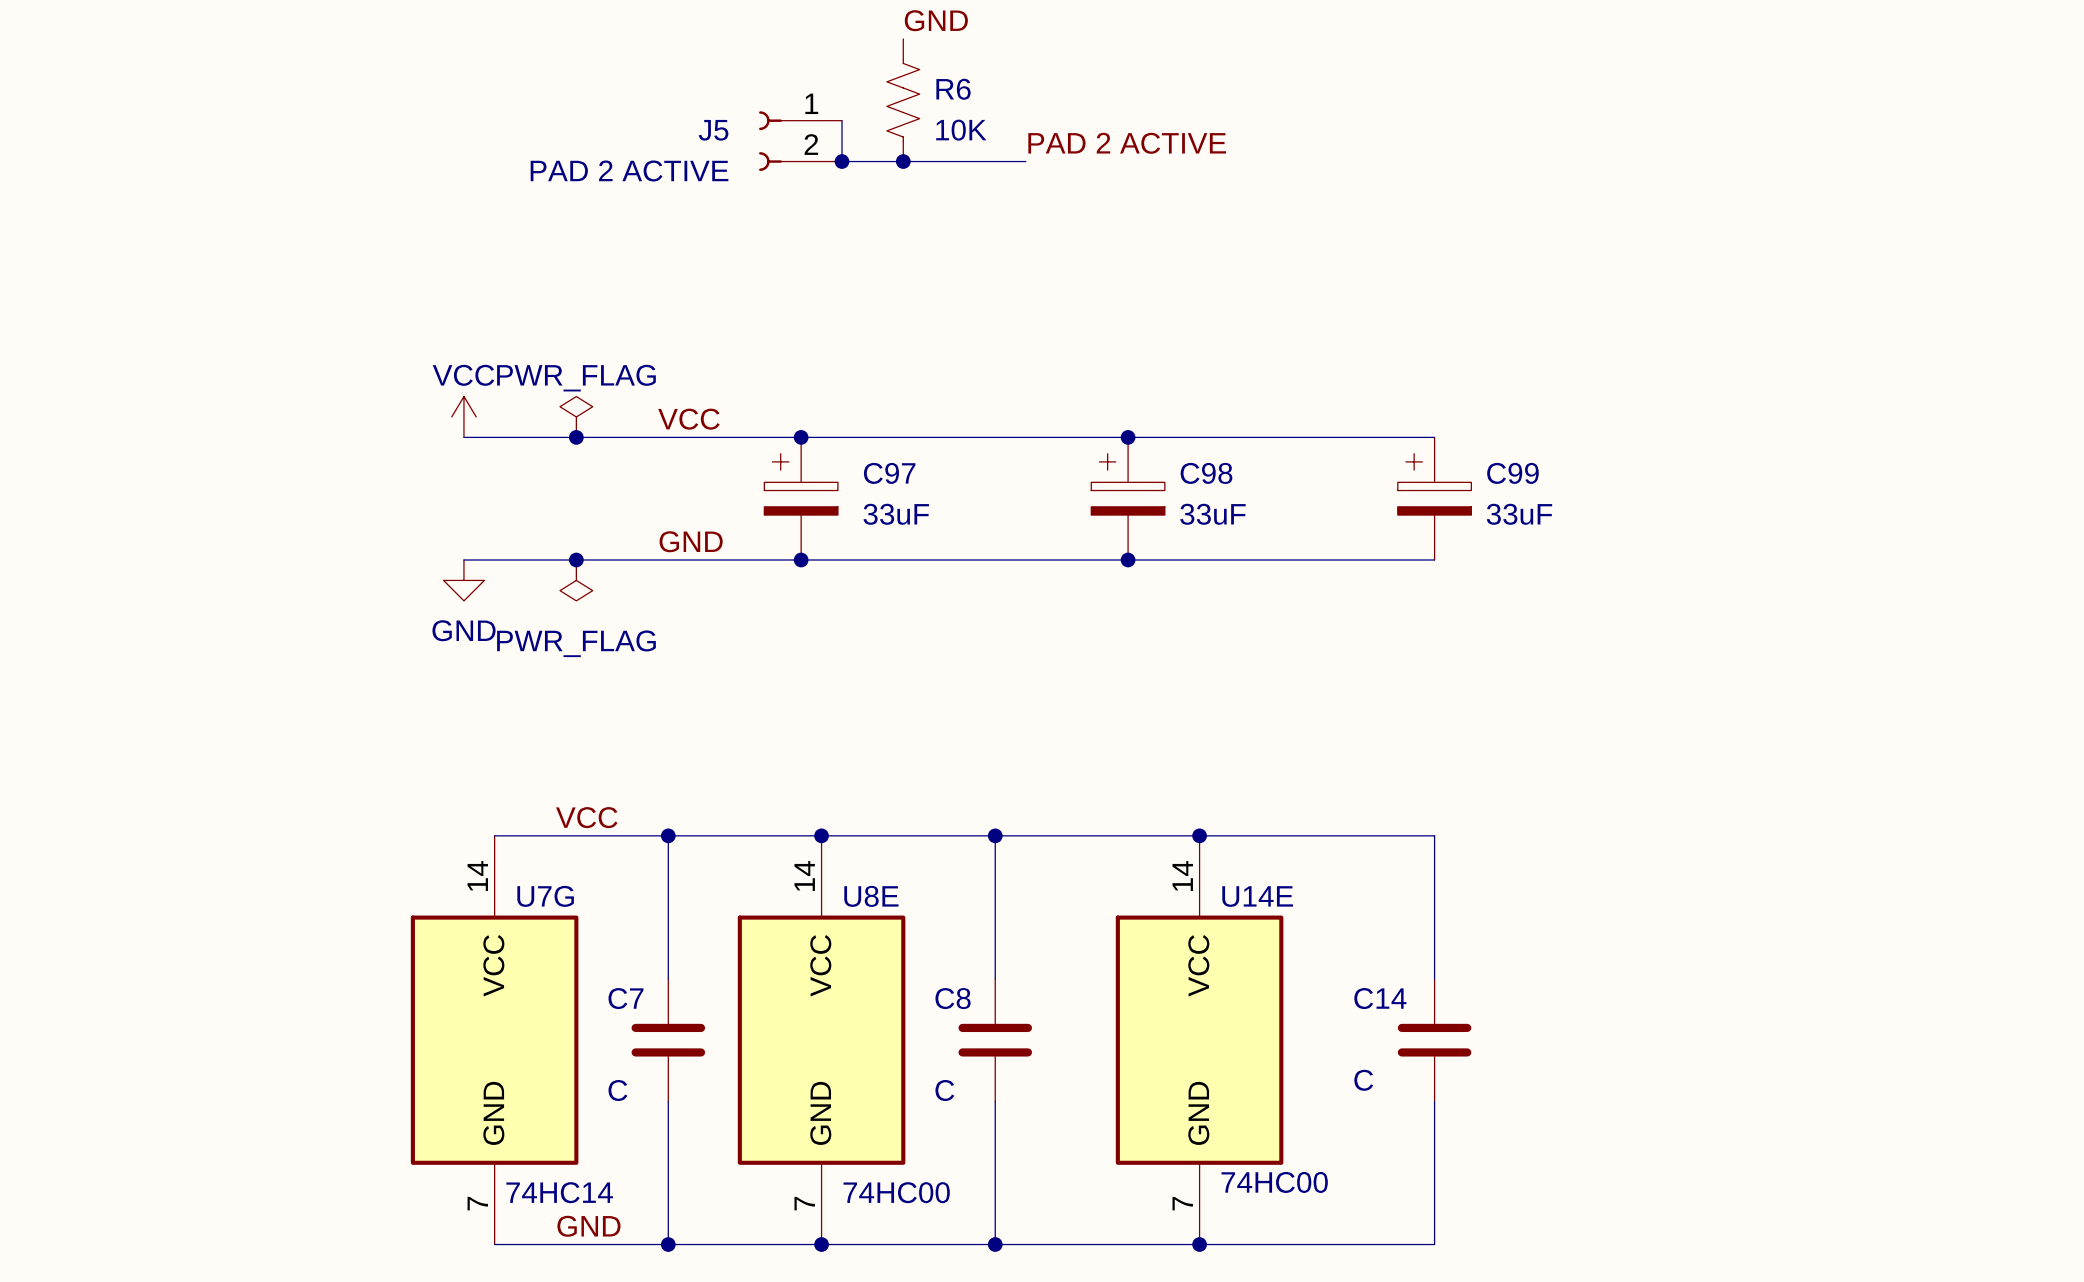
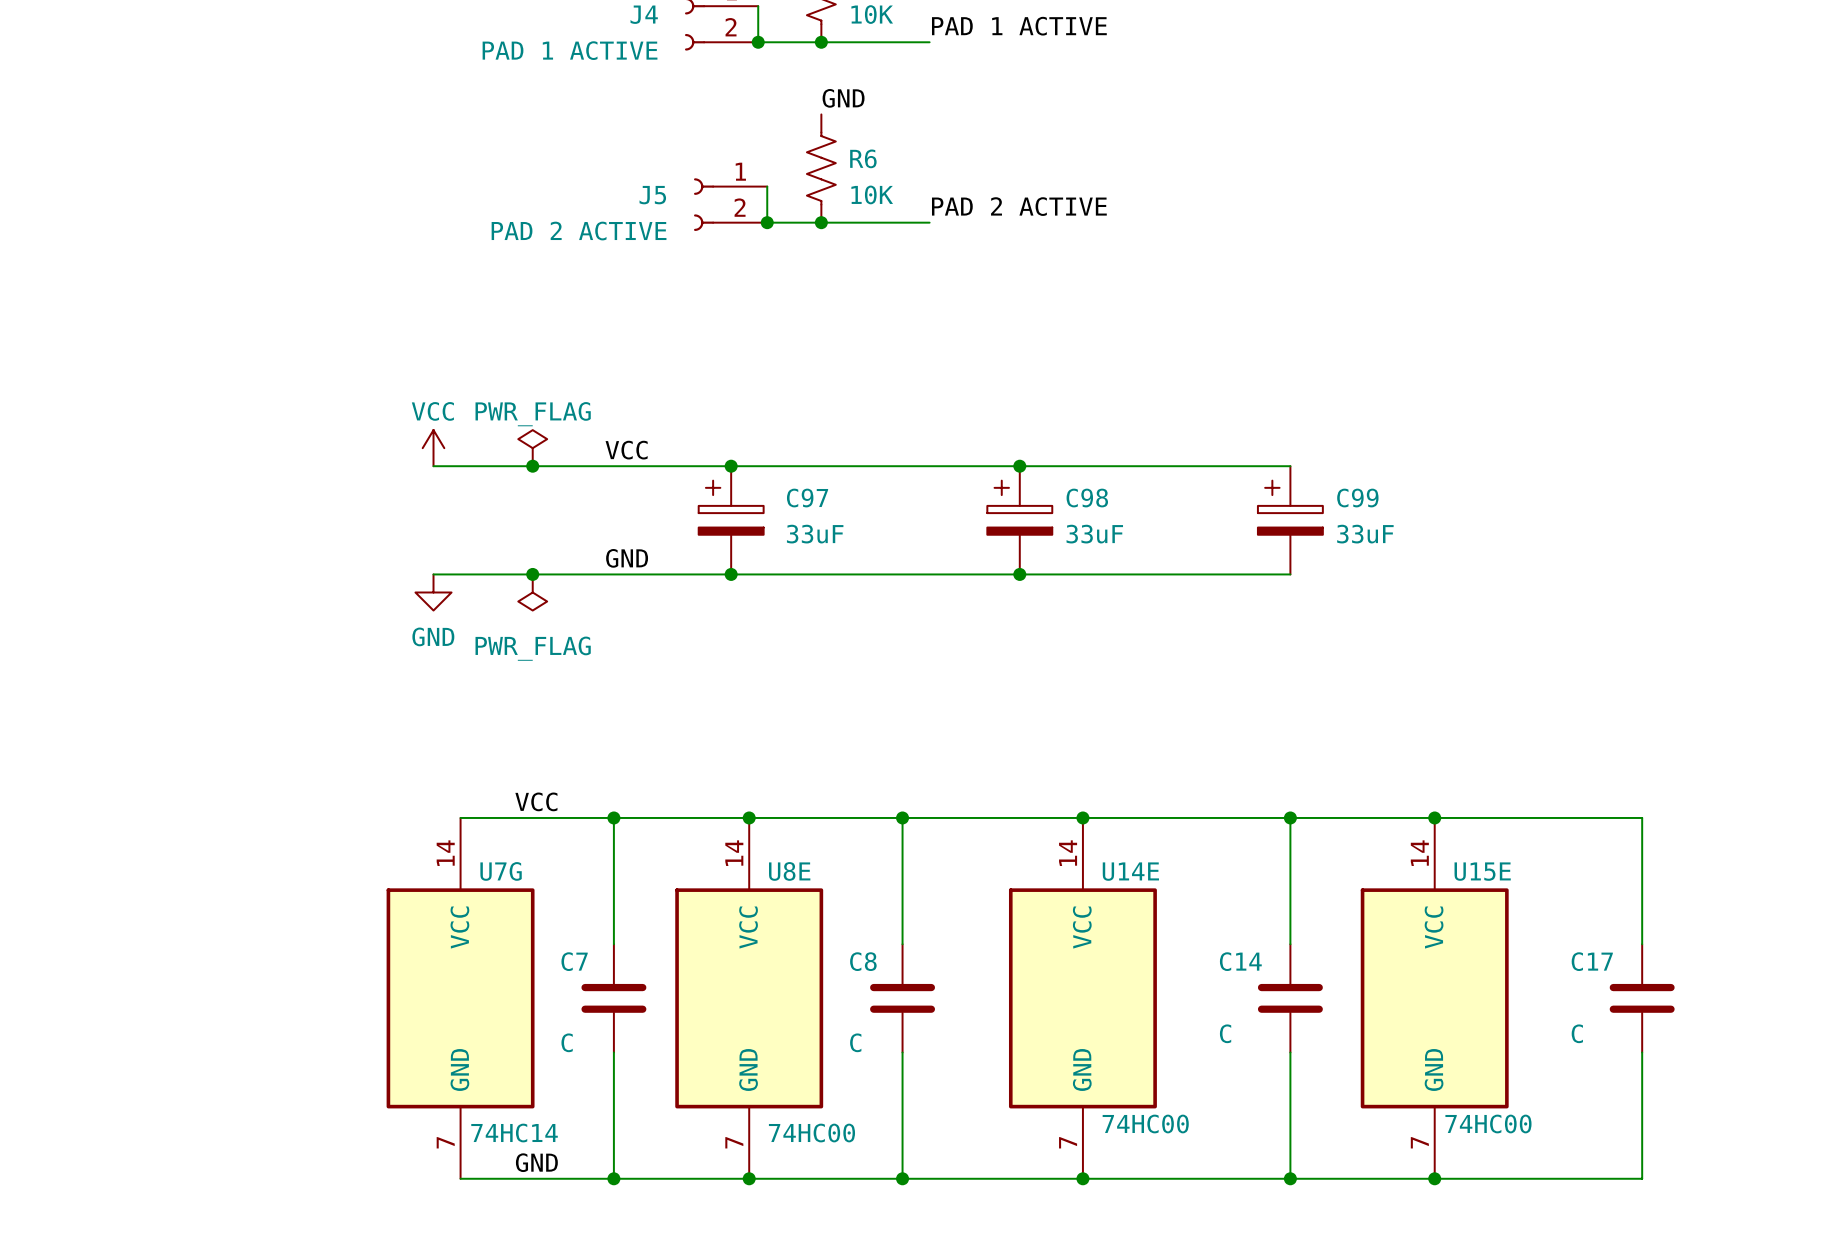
wire: none -> (1290, 817) (1642, 817) (1642, 944)
junction: none -> (1290, 817)
junction: none -> (1434, 817)
U15E: none -> 74HC00 (1434, 998)
C17: none -> C (1642, 998)
wire: none -> (1642, 1052) (1642, 1178) (1290, 1178)
junction: none -> (1290, 1178)
junction: none -> (1434, 1178)

